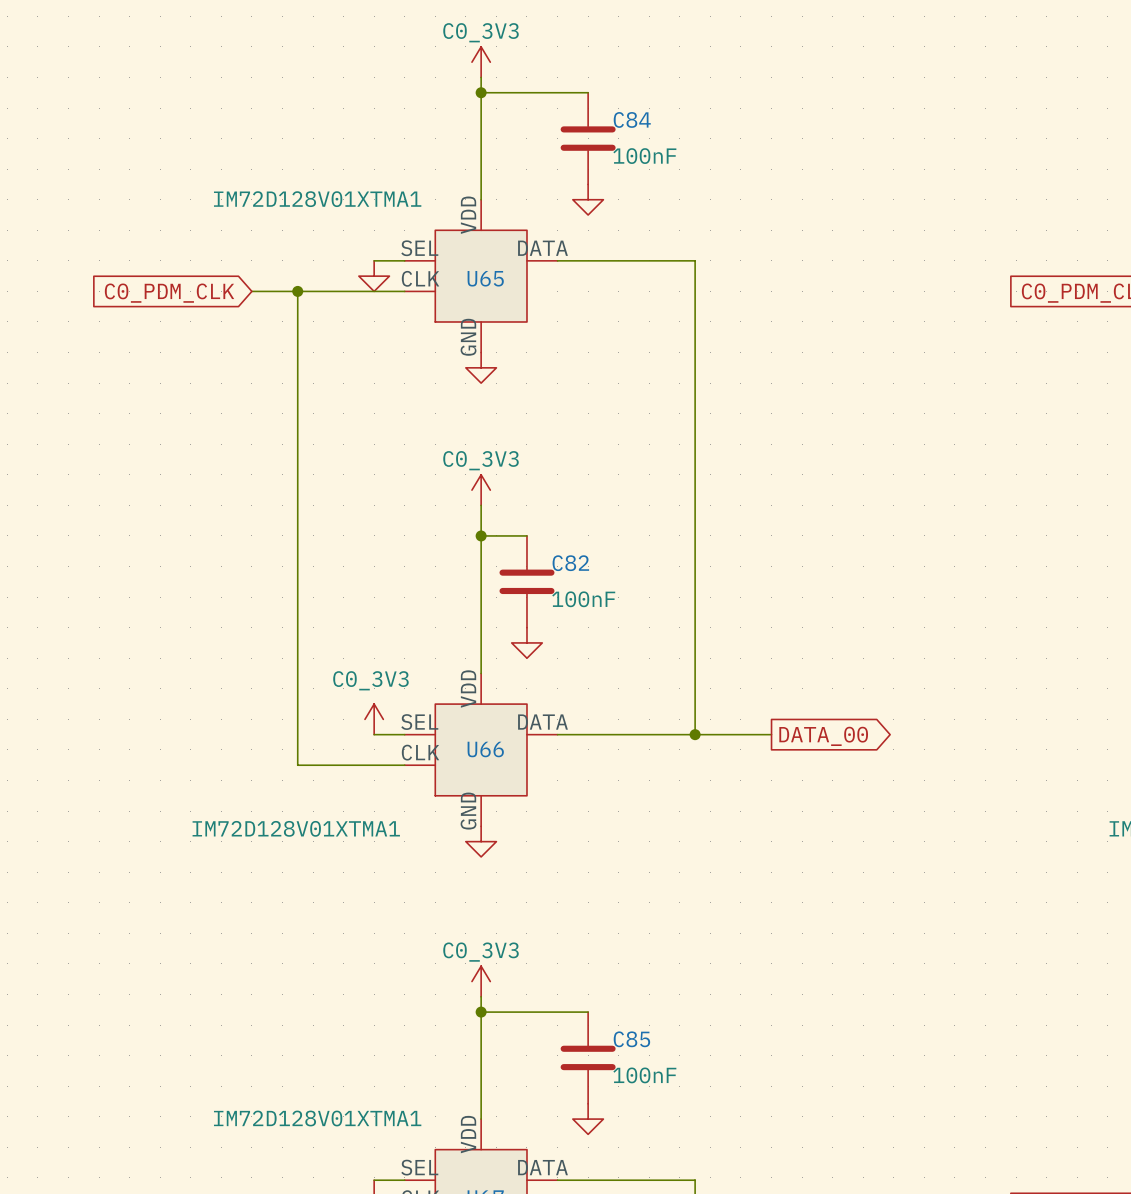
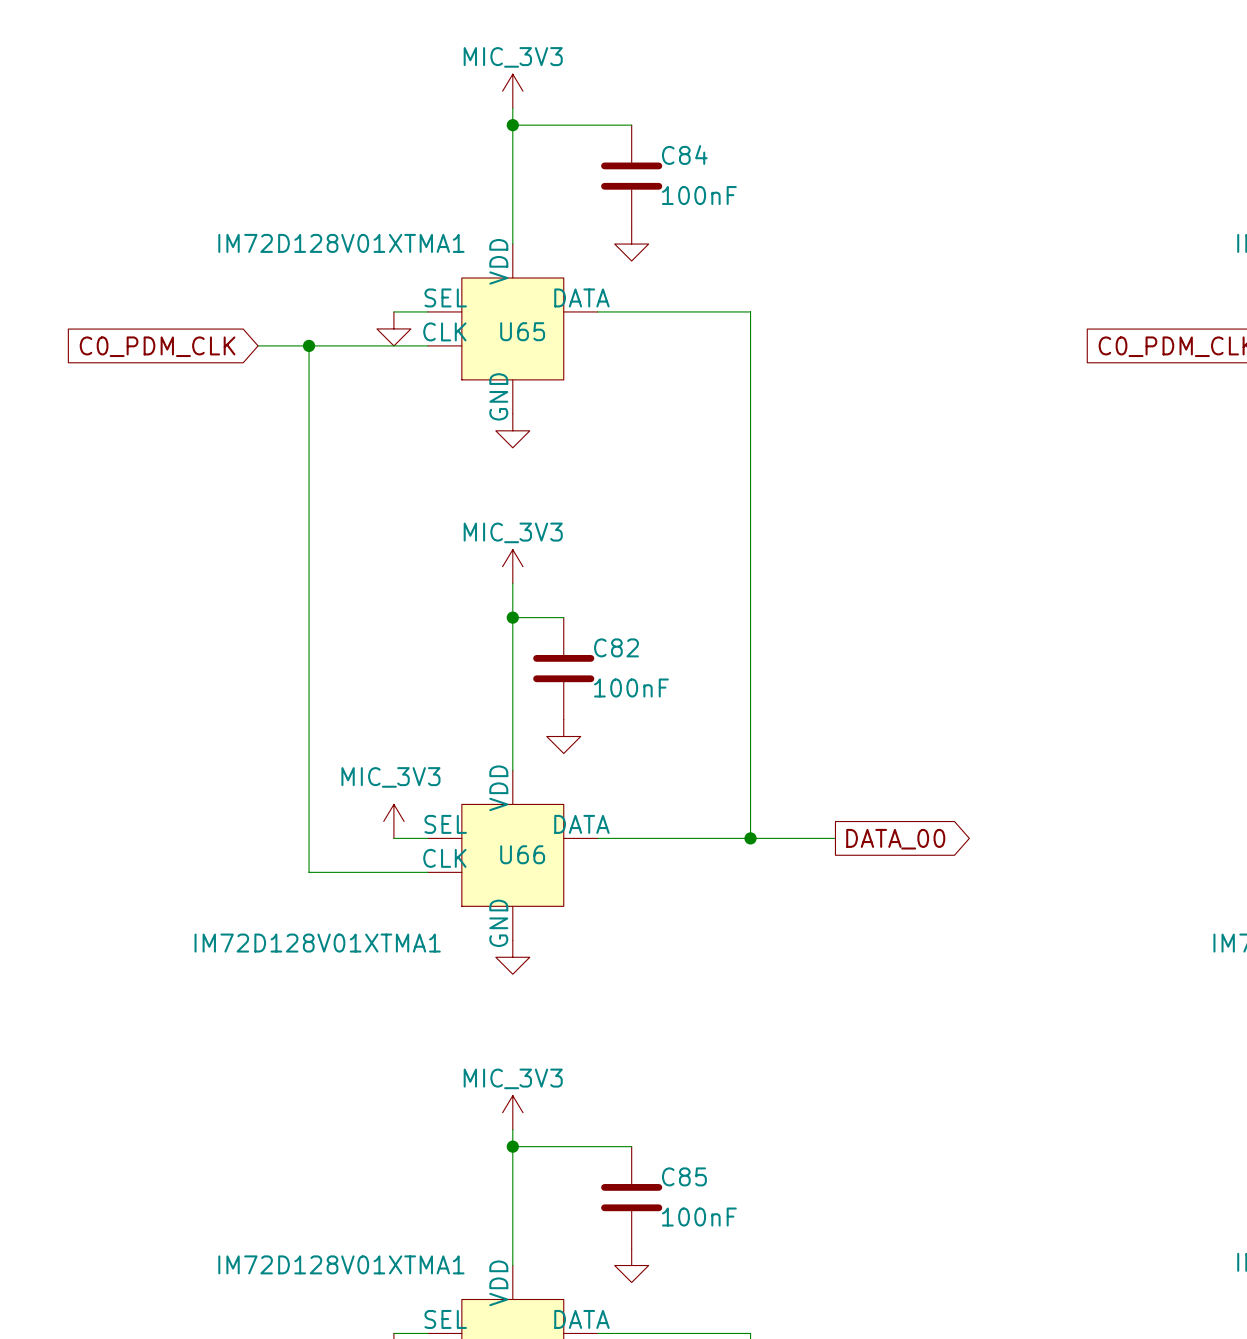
power symbol: C0_3V3 (481, 62) -> MIC_3V3 (512, 91)
power symbol: C0_3V3 (481, 490) -> MIC_3V3 (512, 566)
power symbol: C0_3V3 (374, 719) -> MIC_3V3 (393, 821)
power symbol: C0_3V3 (481, 981) -> MIC_3V3 (512, 1112)

